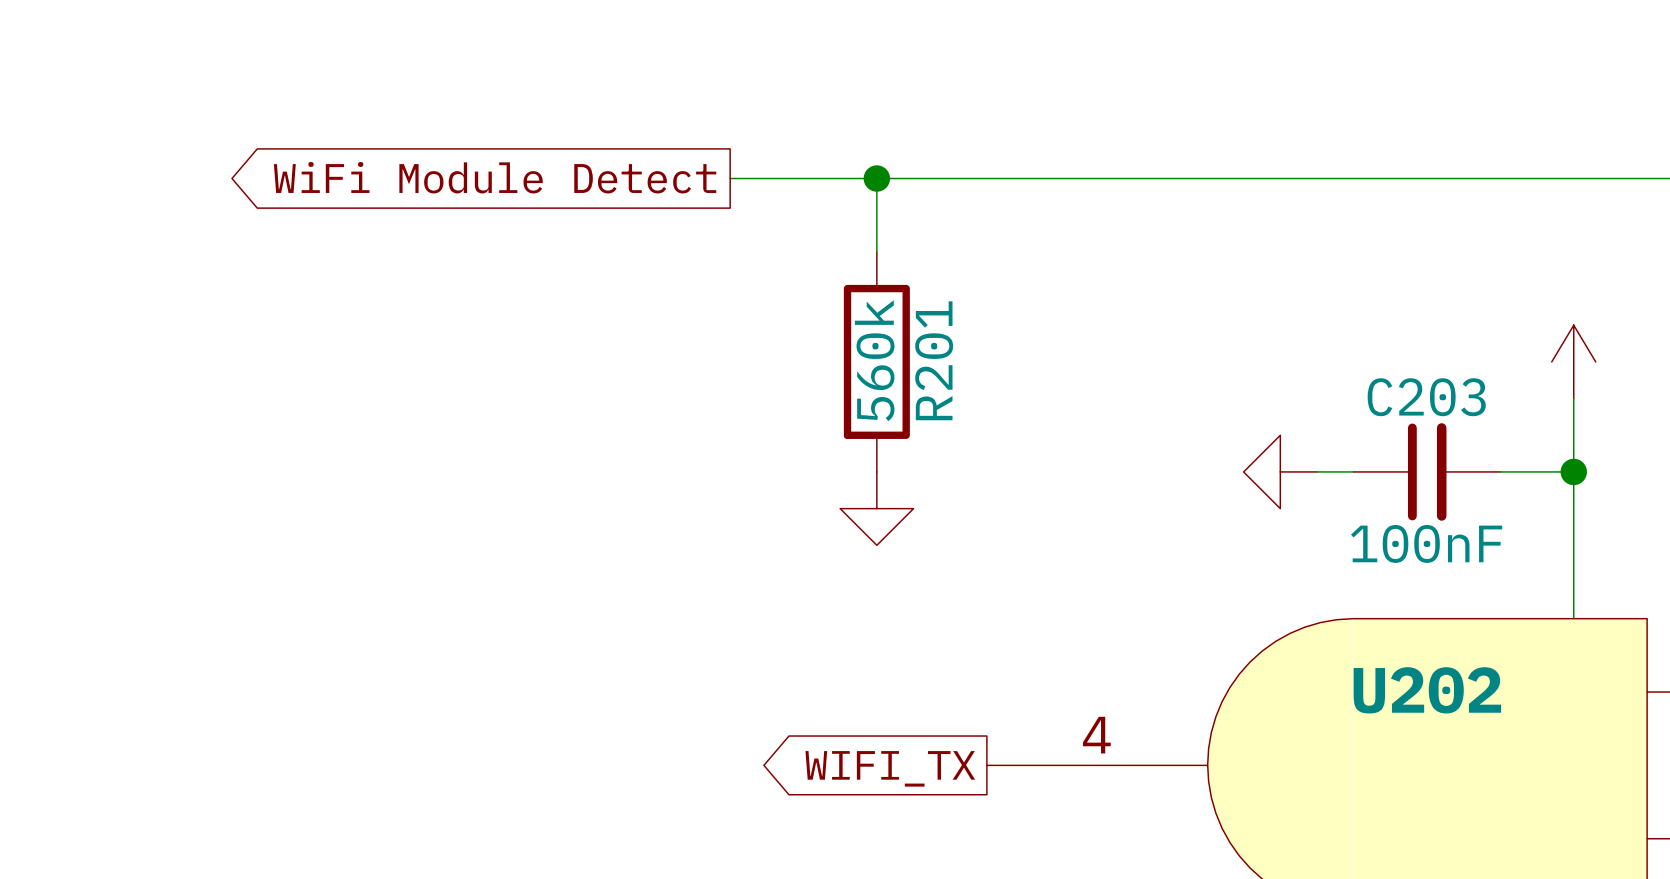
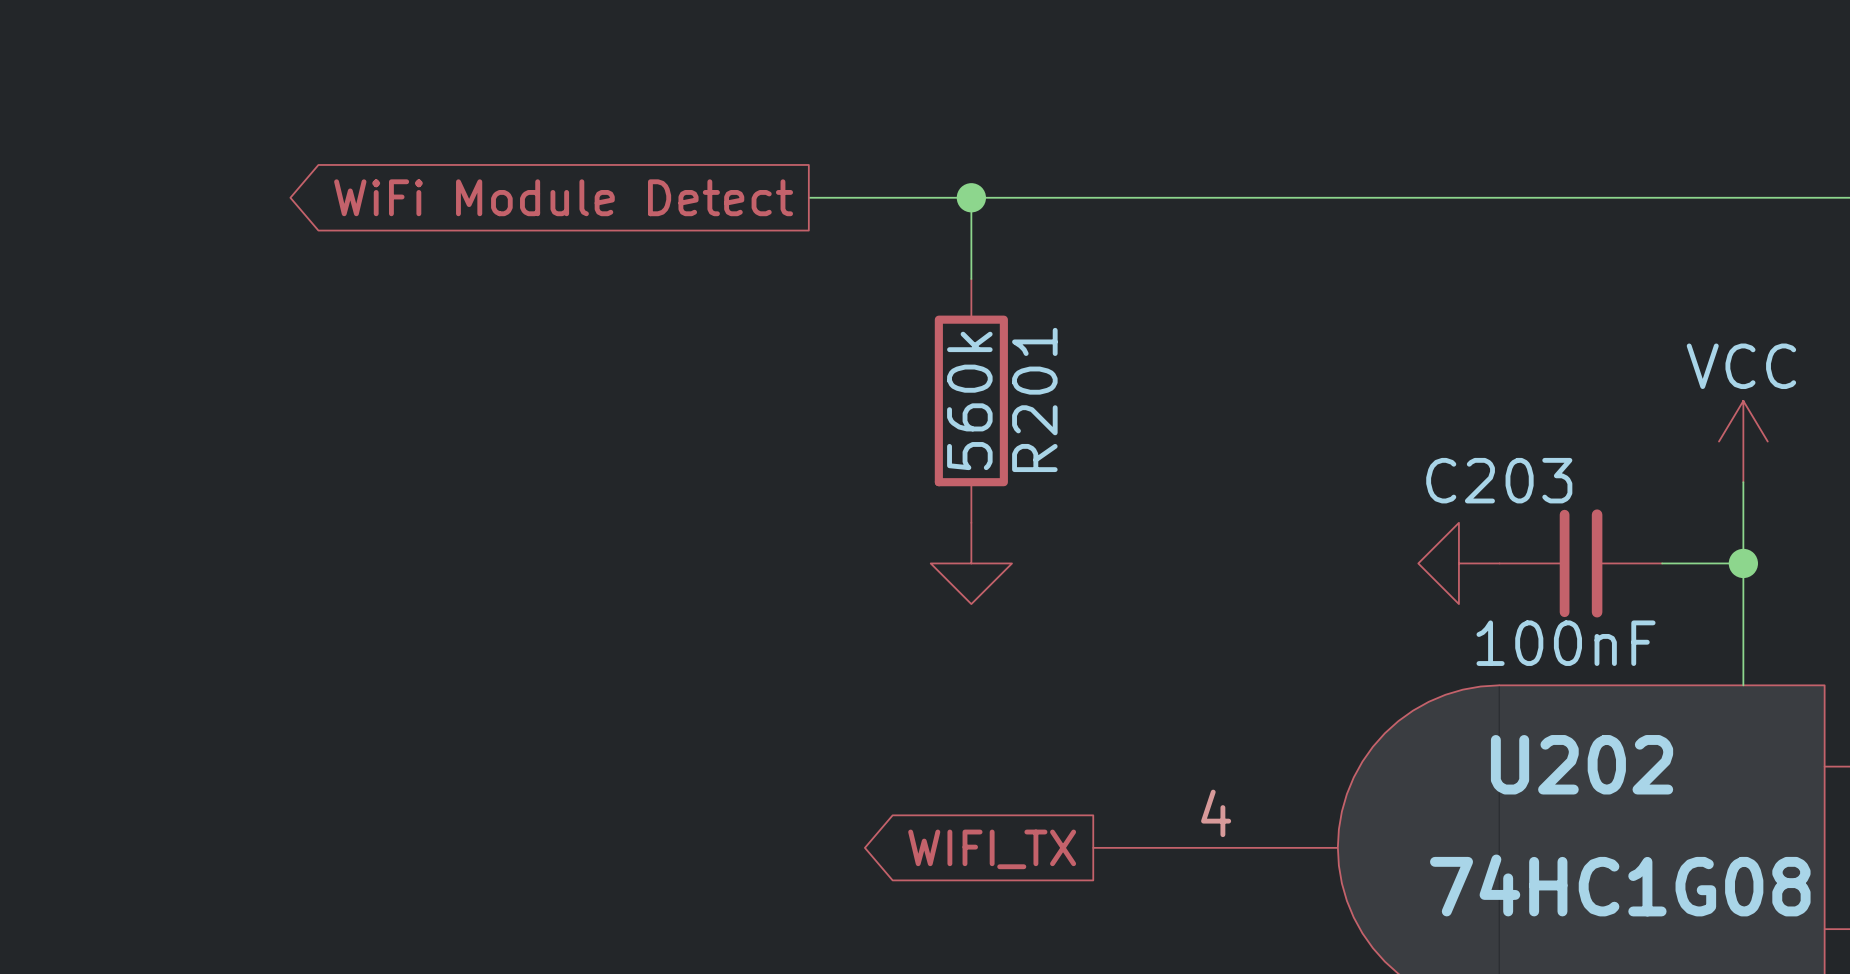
power symbol: (1573, 361) -> none
C203 name position: C203 (1426, 397) -> C203 (1499, 480)
power symbol: none -> VCC (1743, 441)
power symbol position: (1280, 471) -> (1458, 563)
wire: (1317, 471) (1353, 471) -> none
C203 position: (1427, 471) -> (1580, 563)
wire: (1500, 471) (1573, 471) -> (1662, 563) (1743, 563)
junction position: (1573, 471) -> (1743, 563)
C203 value position: 100nF (1426, 543) -> 100nF (1566, 643)
U202 value: none -> 74HC1G08 (1620, 885)

